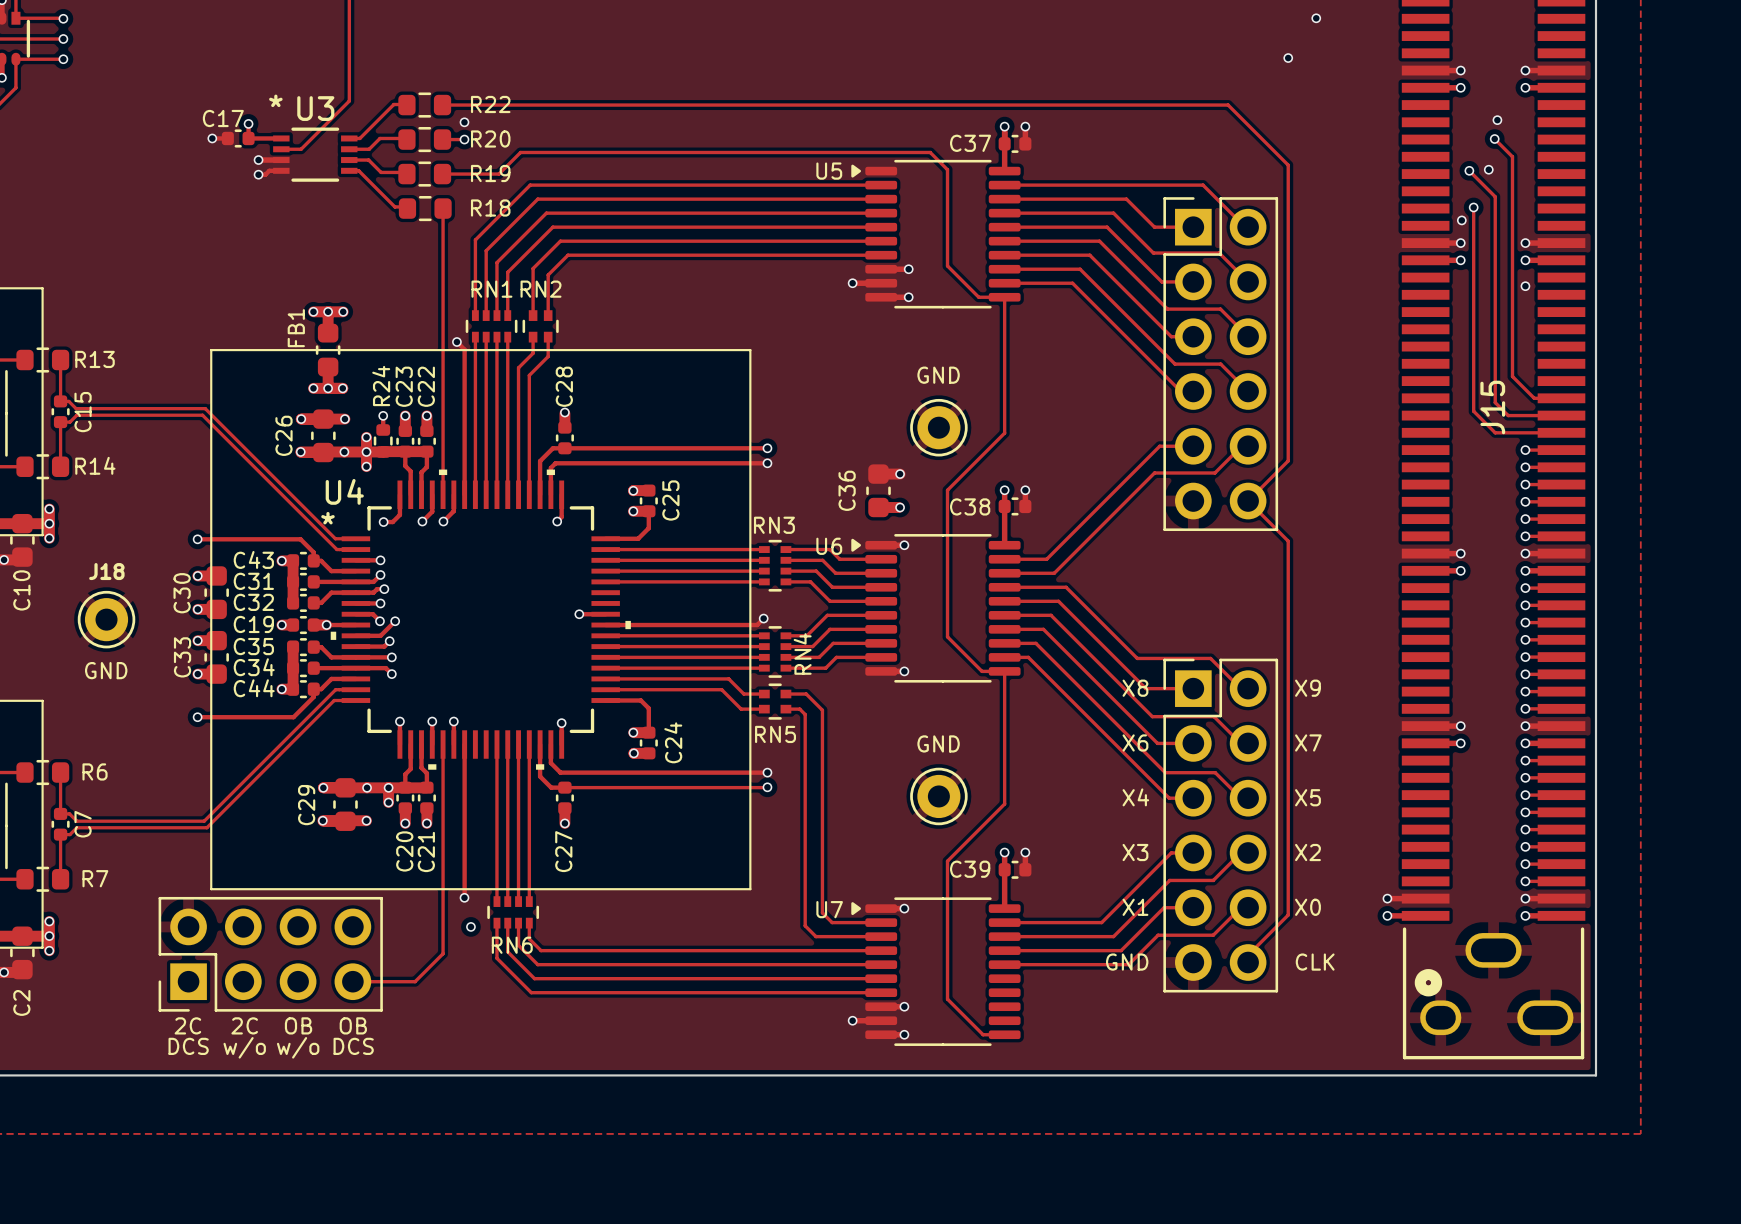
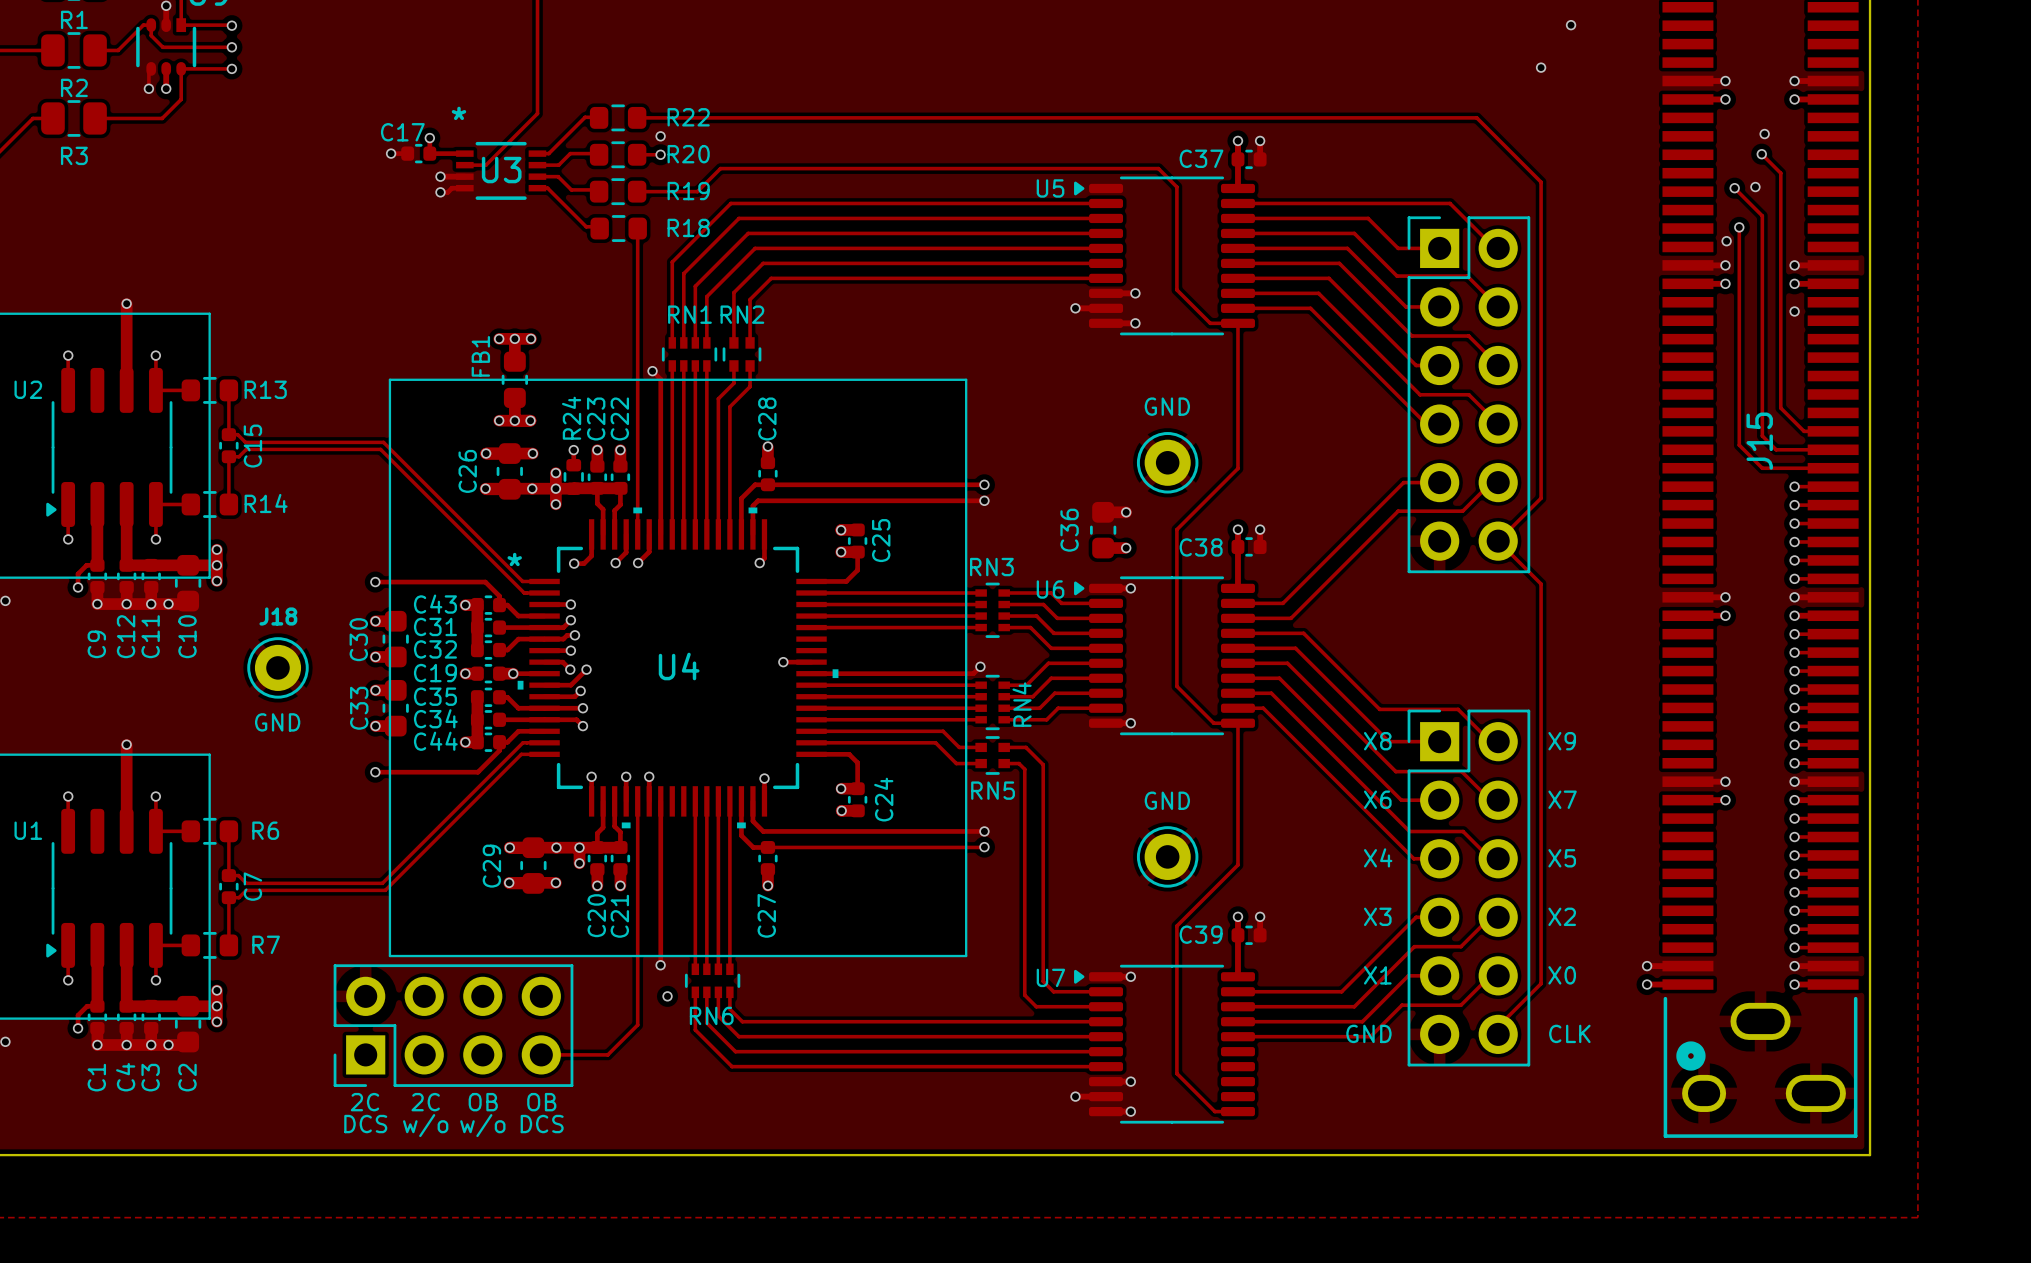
U3 name position: U3 (315, 108) -> U3 (501, 170)
U4 name position: U4 (344, 491) -> U4 (679, 666)

